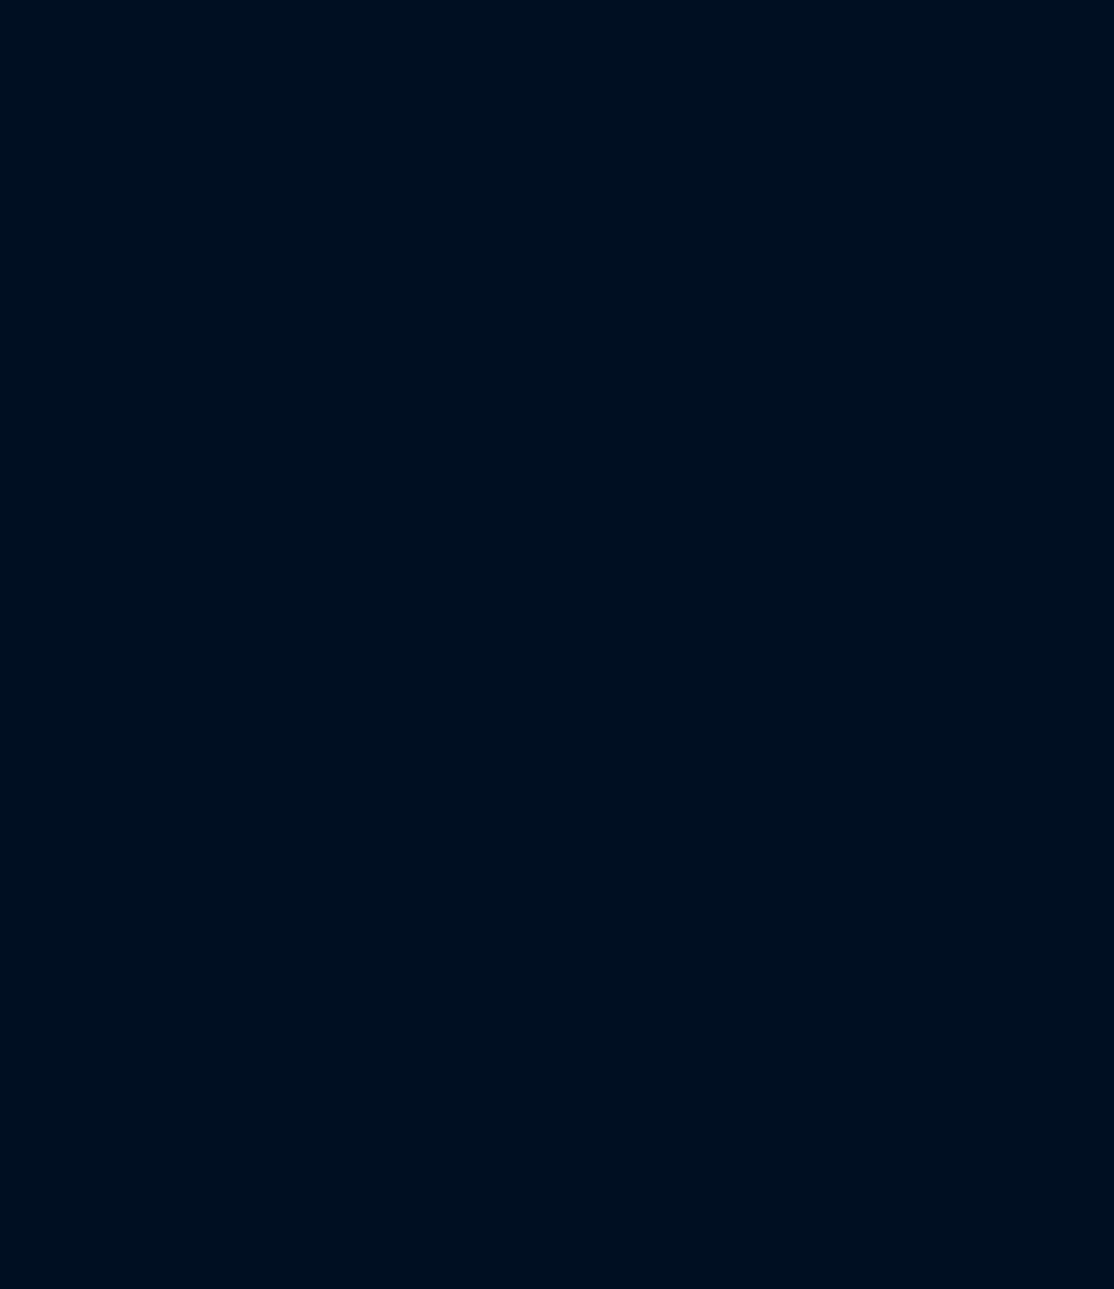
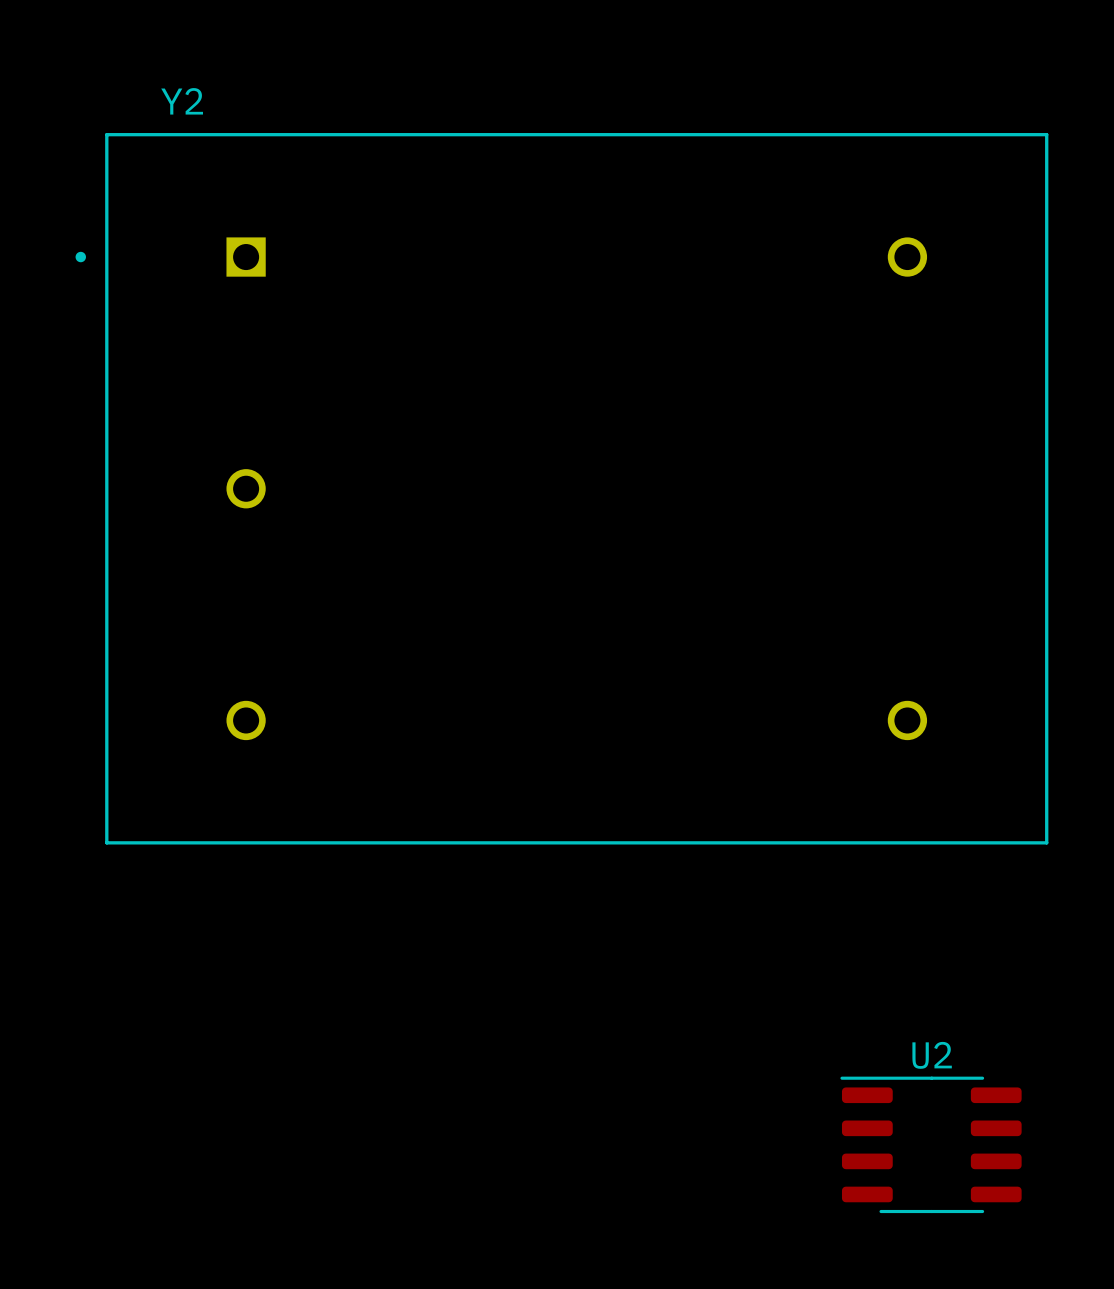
Y2: none -> (561, 488)
U2: none -> (931, 1144)

